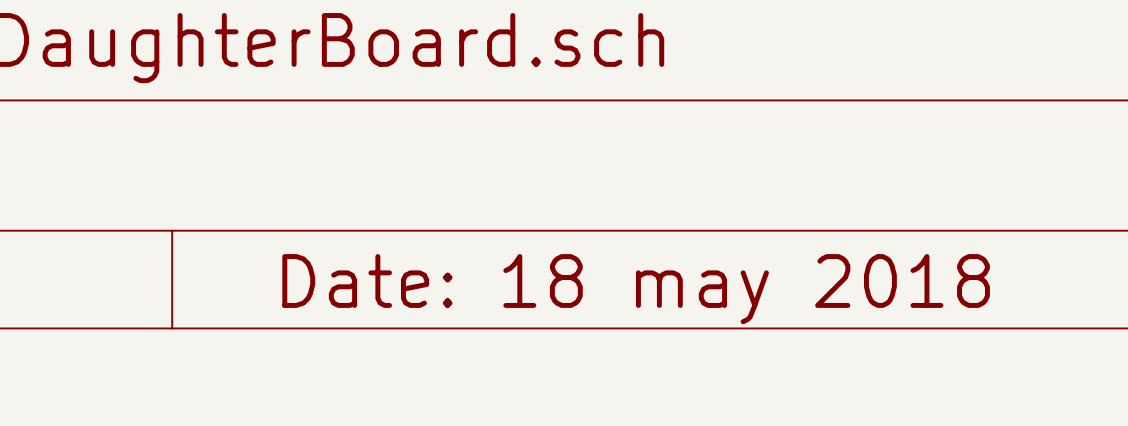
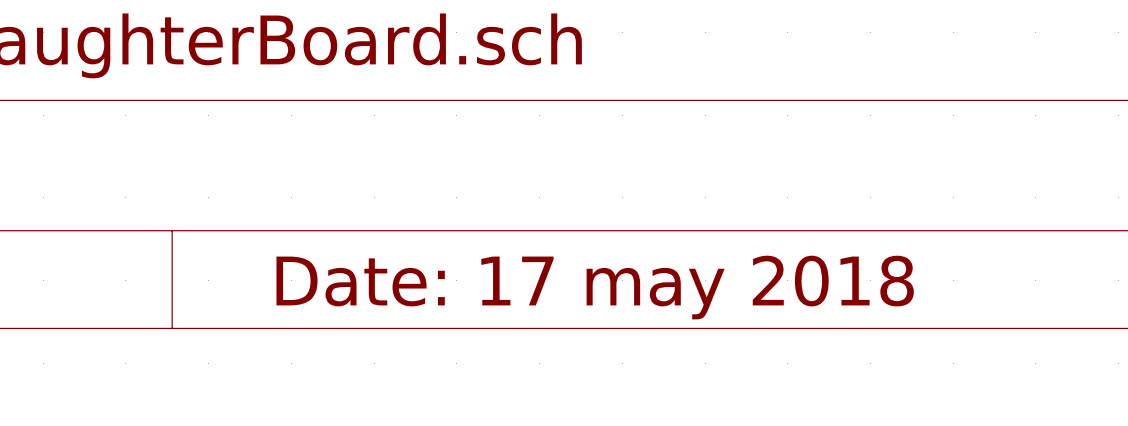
title block: Date: 18 may 2018 (636, 289) -> Date: 17 may 2018 (595, 287)

